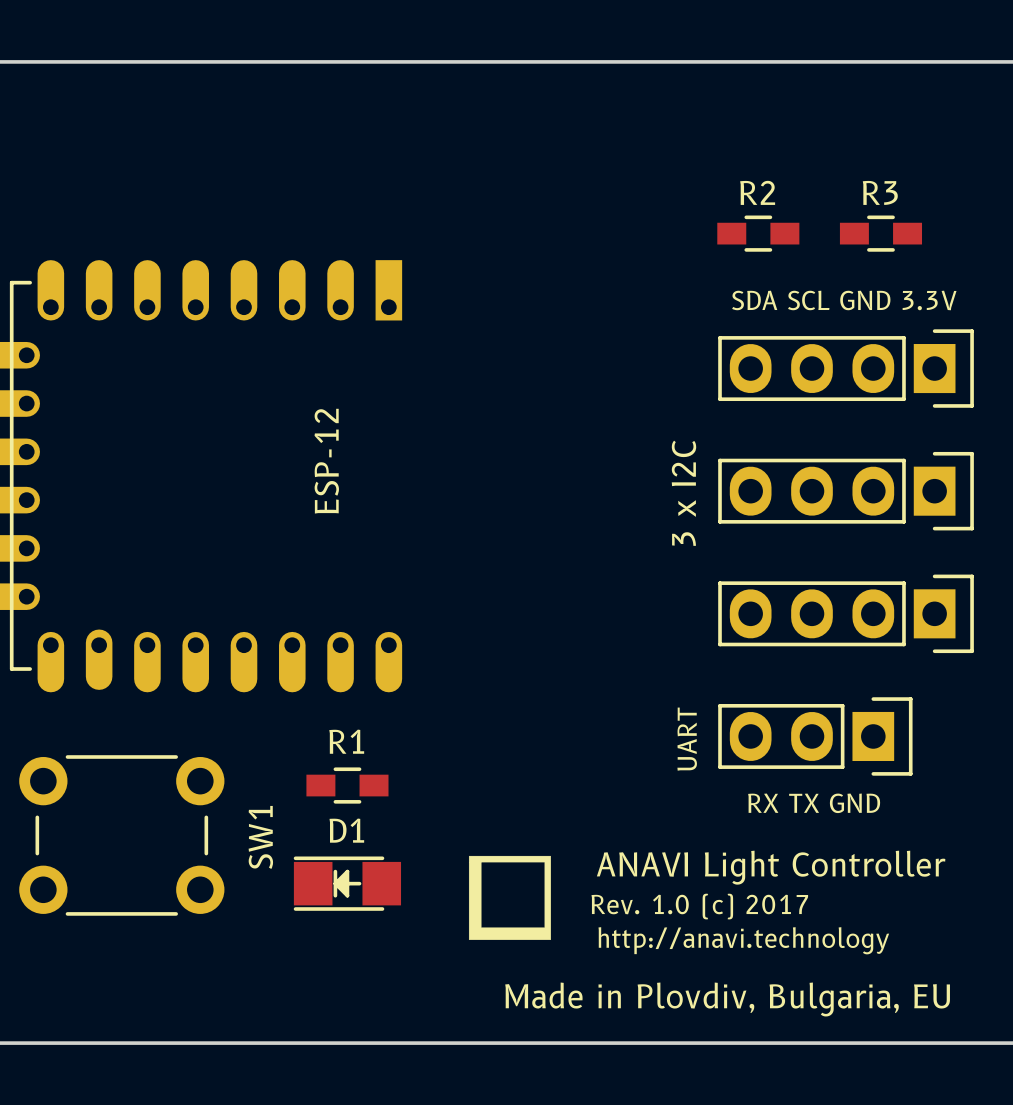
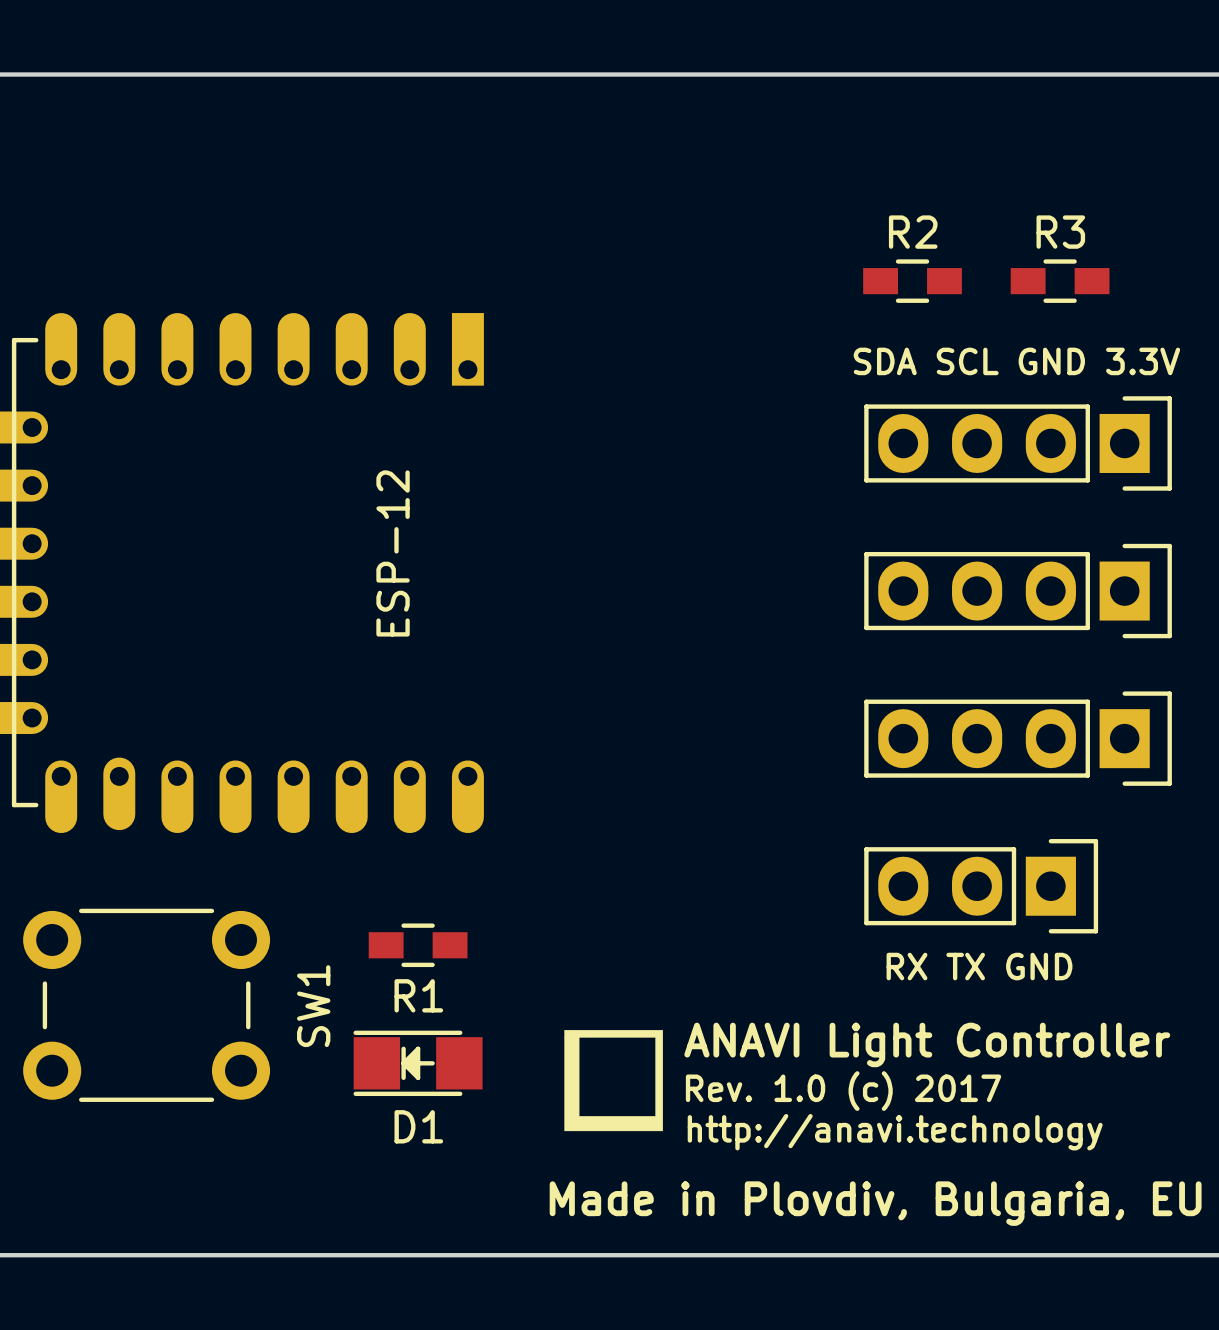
text: 3 x I2C (683, 493) -> none
text: UART (687, 739) -> none
R1 name position: R1 (346, 741) -> R1 (418, 995)
D1 name position: D1 (346, 830) -> D1 (418, 1126)

